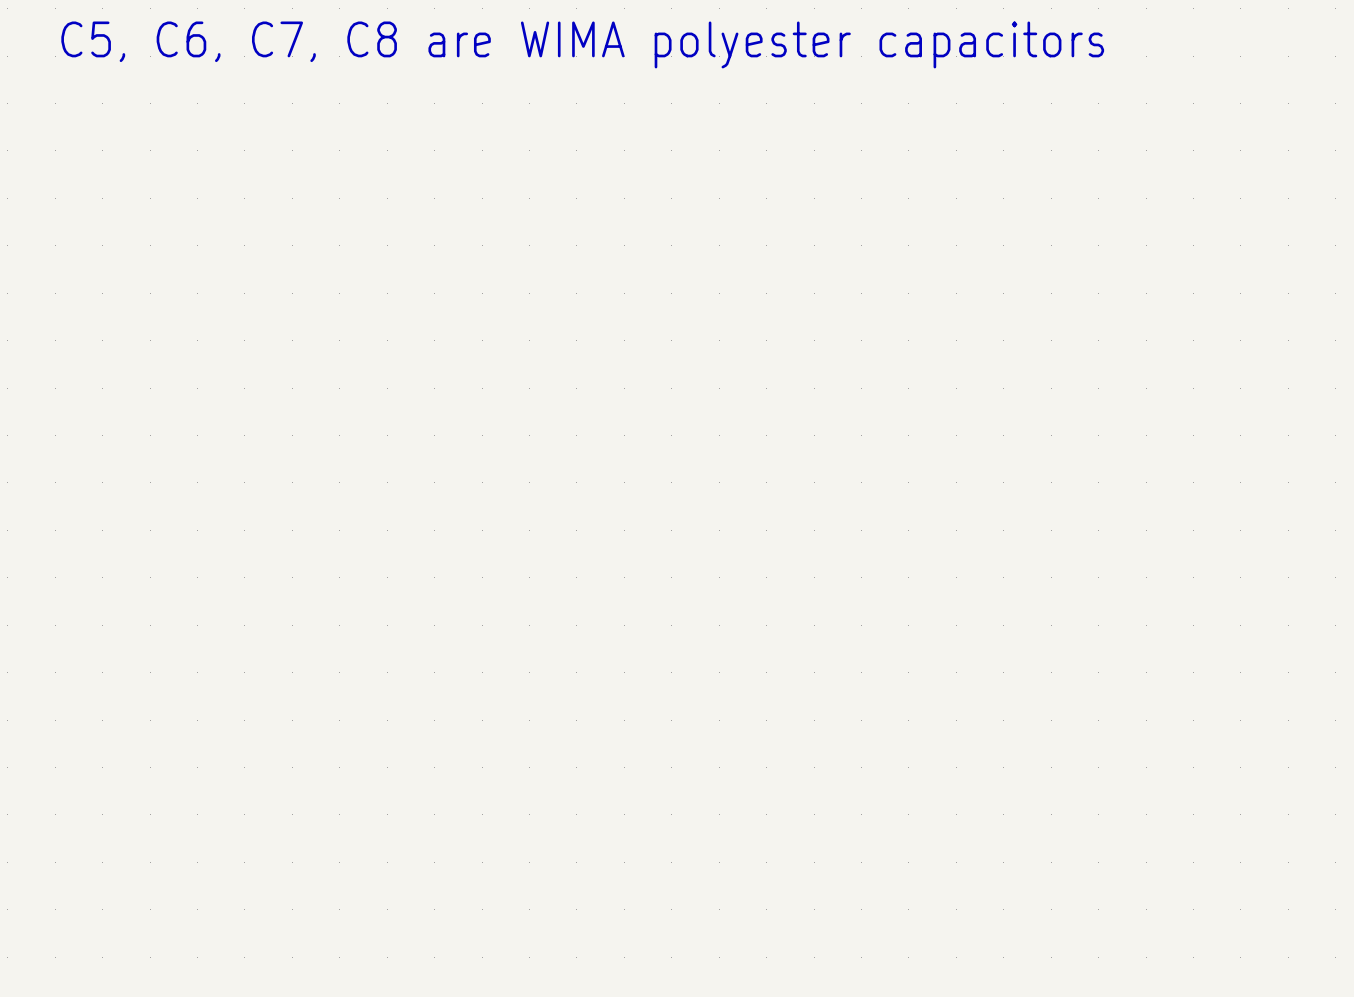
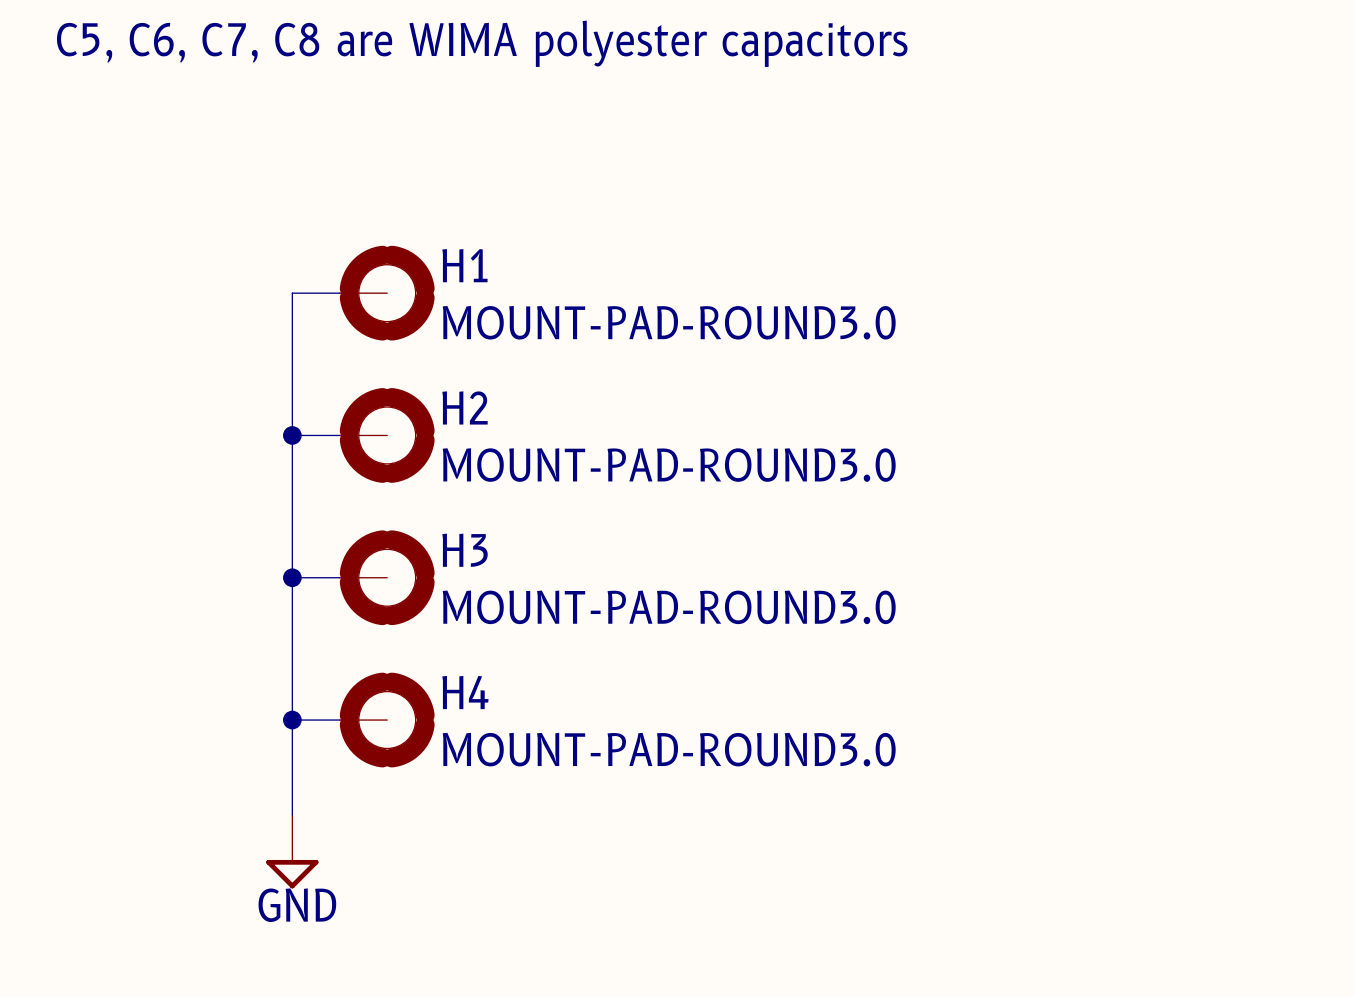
wire: none -> (339, 293) (292, 293) (292, 814)
H1: none -> MOUNT-PAD-ROUND3.0 (387, 293)
wire: none -> (292, 435) (339, 435)
junction: none -> (292, 435)
H2: none -> MOUNT-PAD-ROUND3.0 (387, 435)
wire: none -> (292, 577) (339, 577)
junction: none -> (292, 577)
H3: none -> MOUNT-PAD-ROUND3.0 (387, 577)
wire: none -> (292, 720) (339, 720)
junction: none -> (292, 720)
H4: none -> MOUNT-PAD-ROUND3.0 (387, 720)
power symbol: none -> GND (292, 851)

